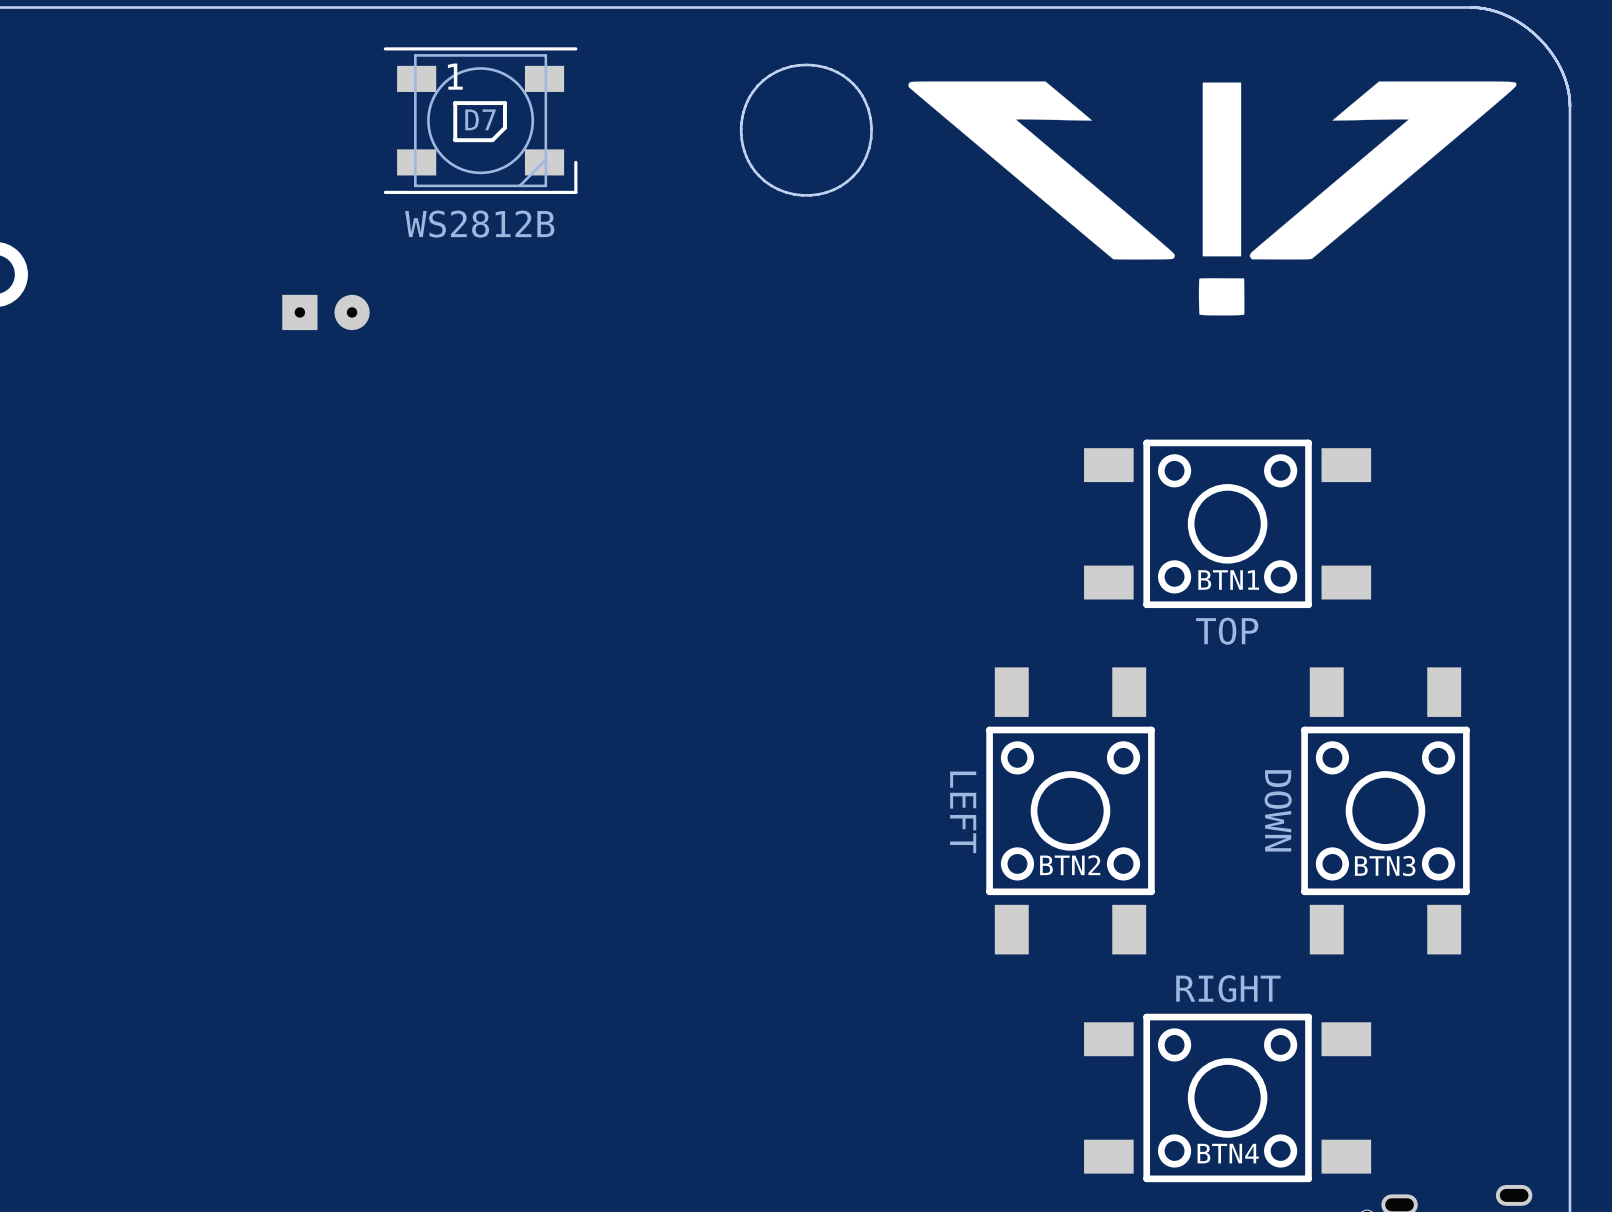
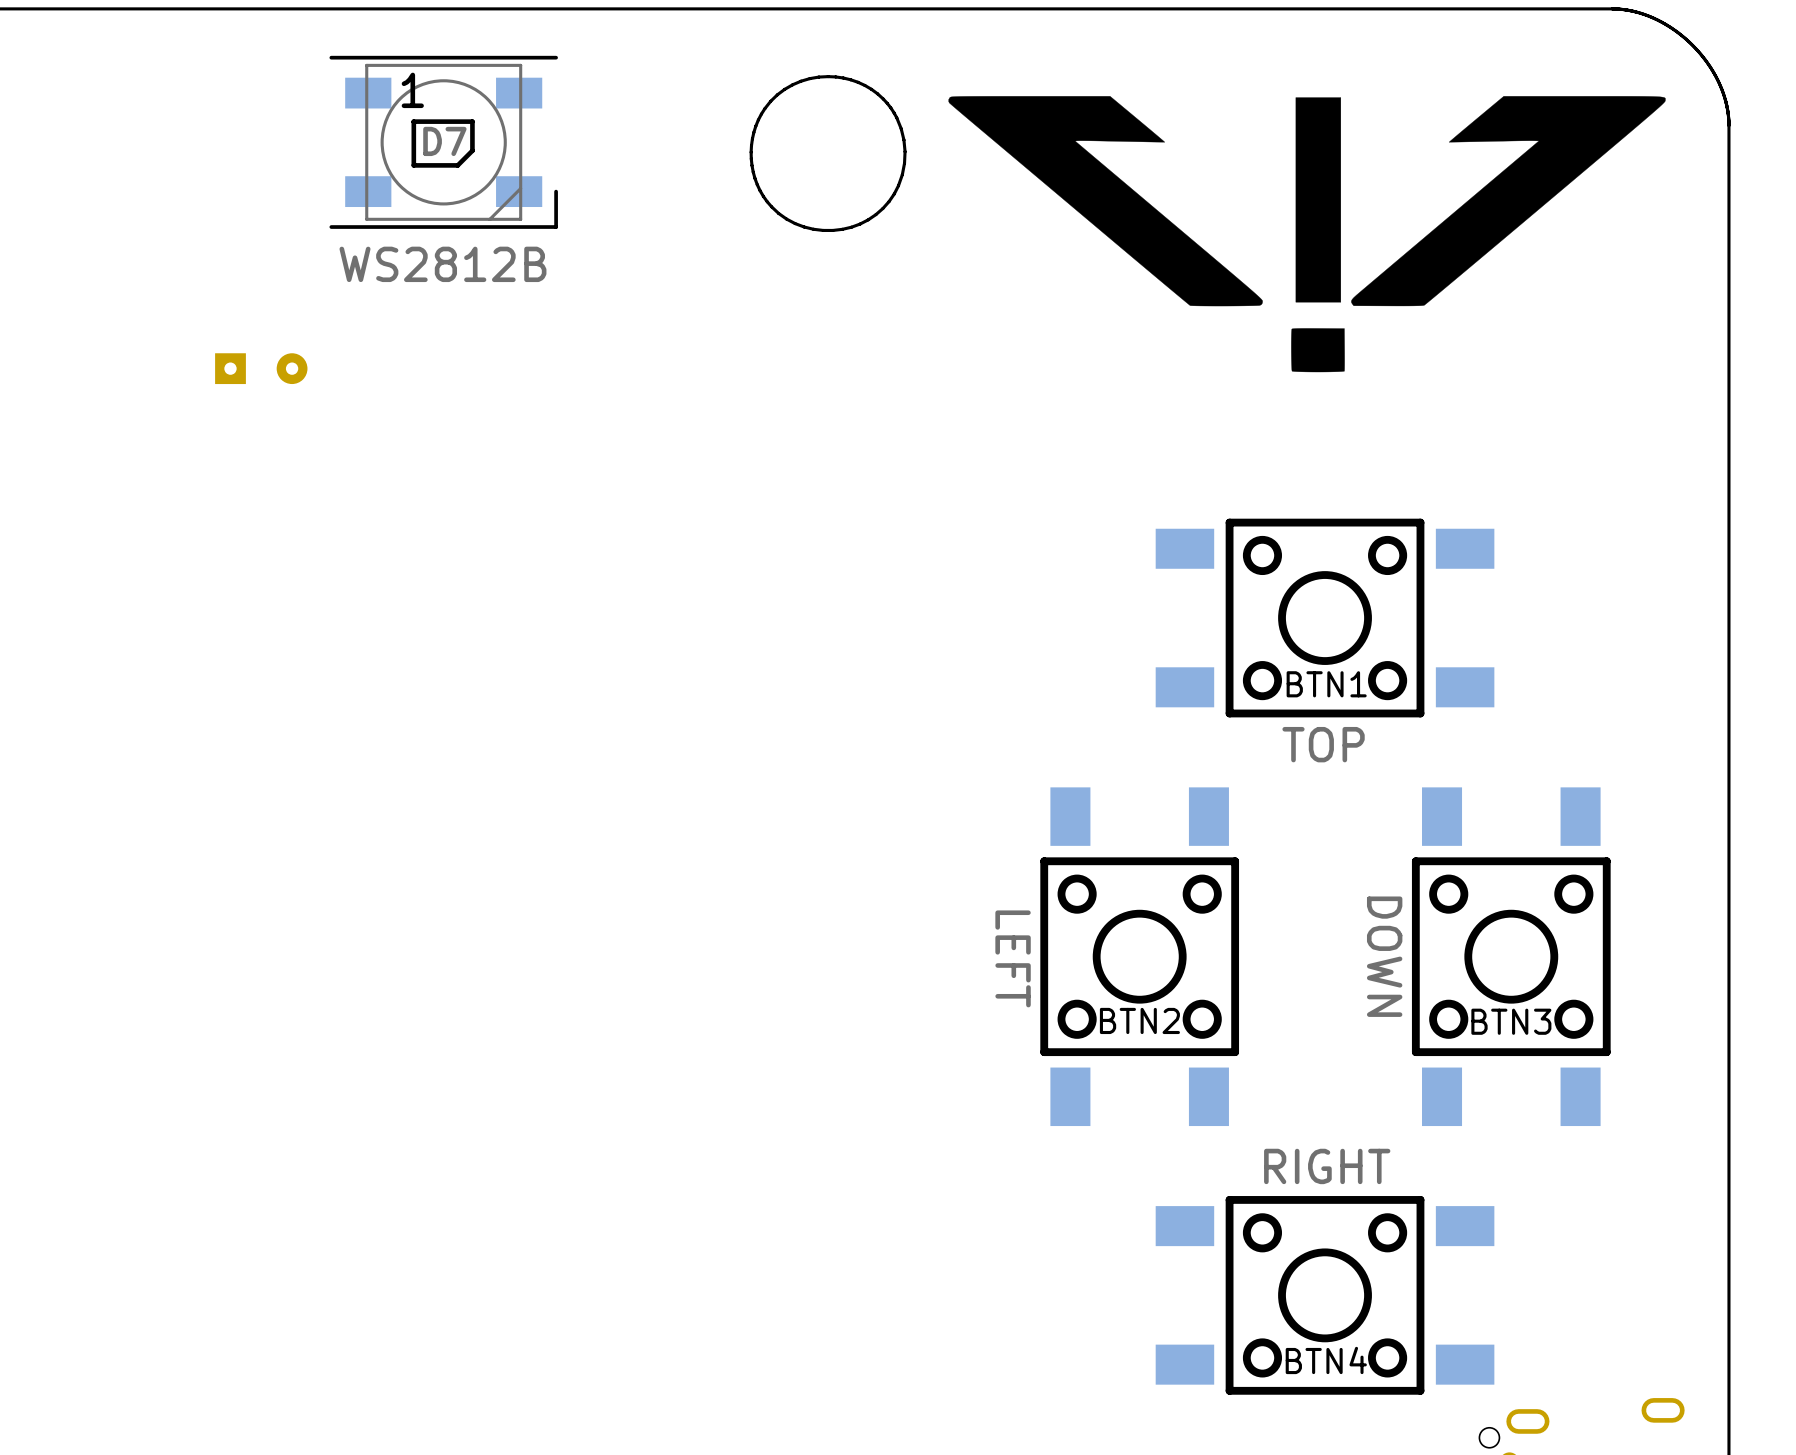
part footprint: [282, 294, 370, 331] -> [215, 353, 308, 385]

